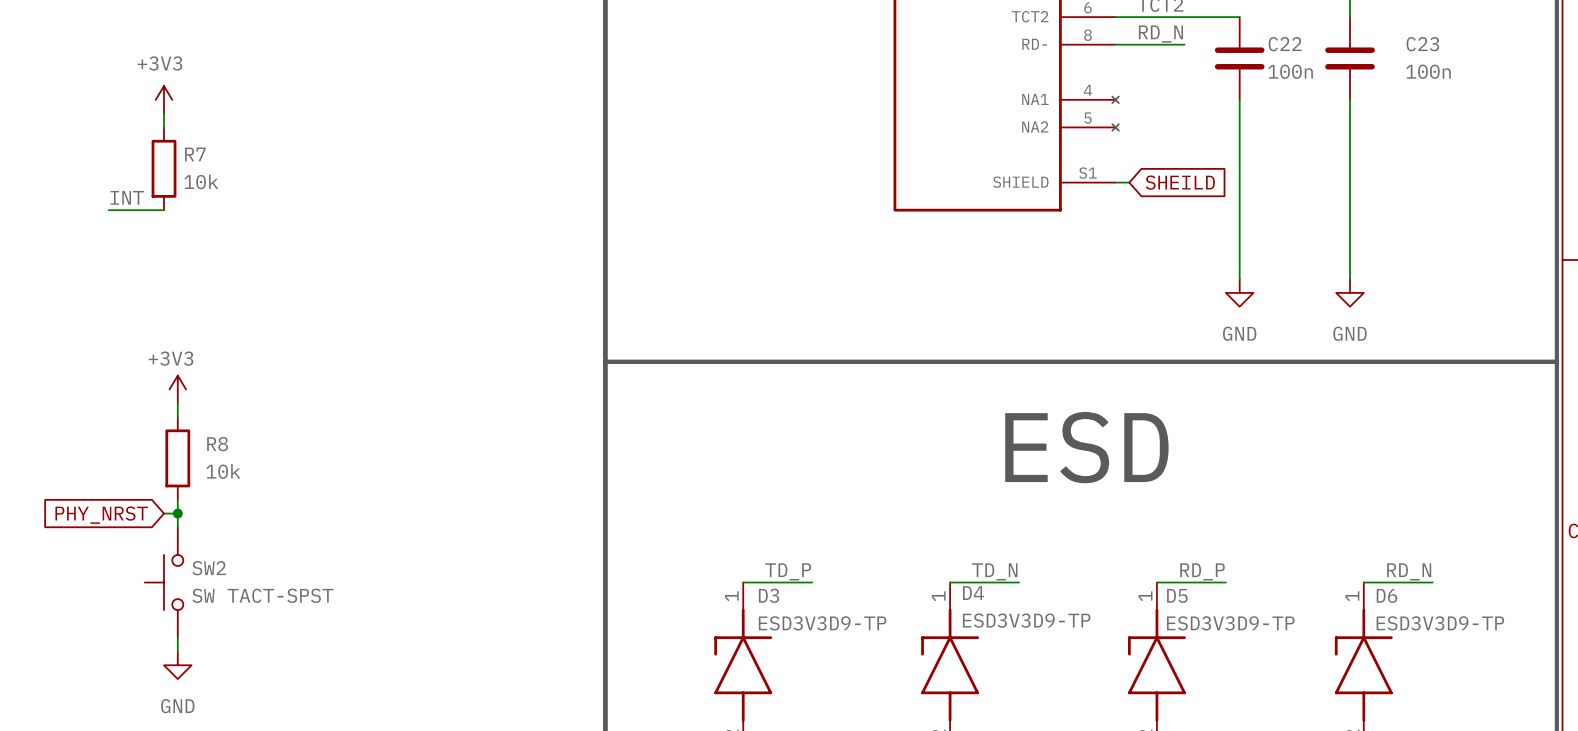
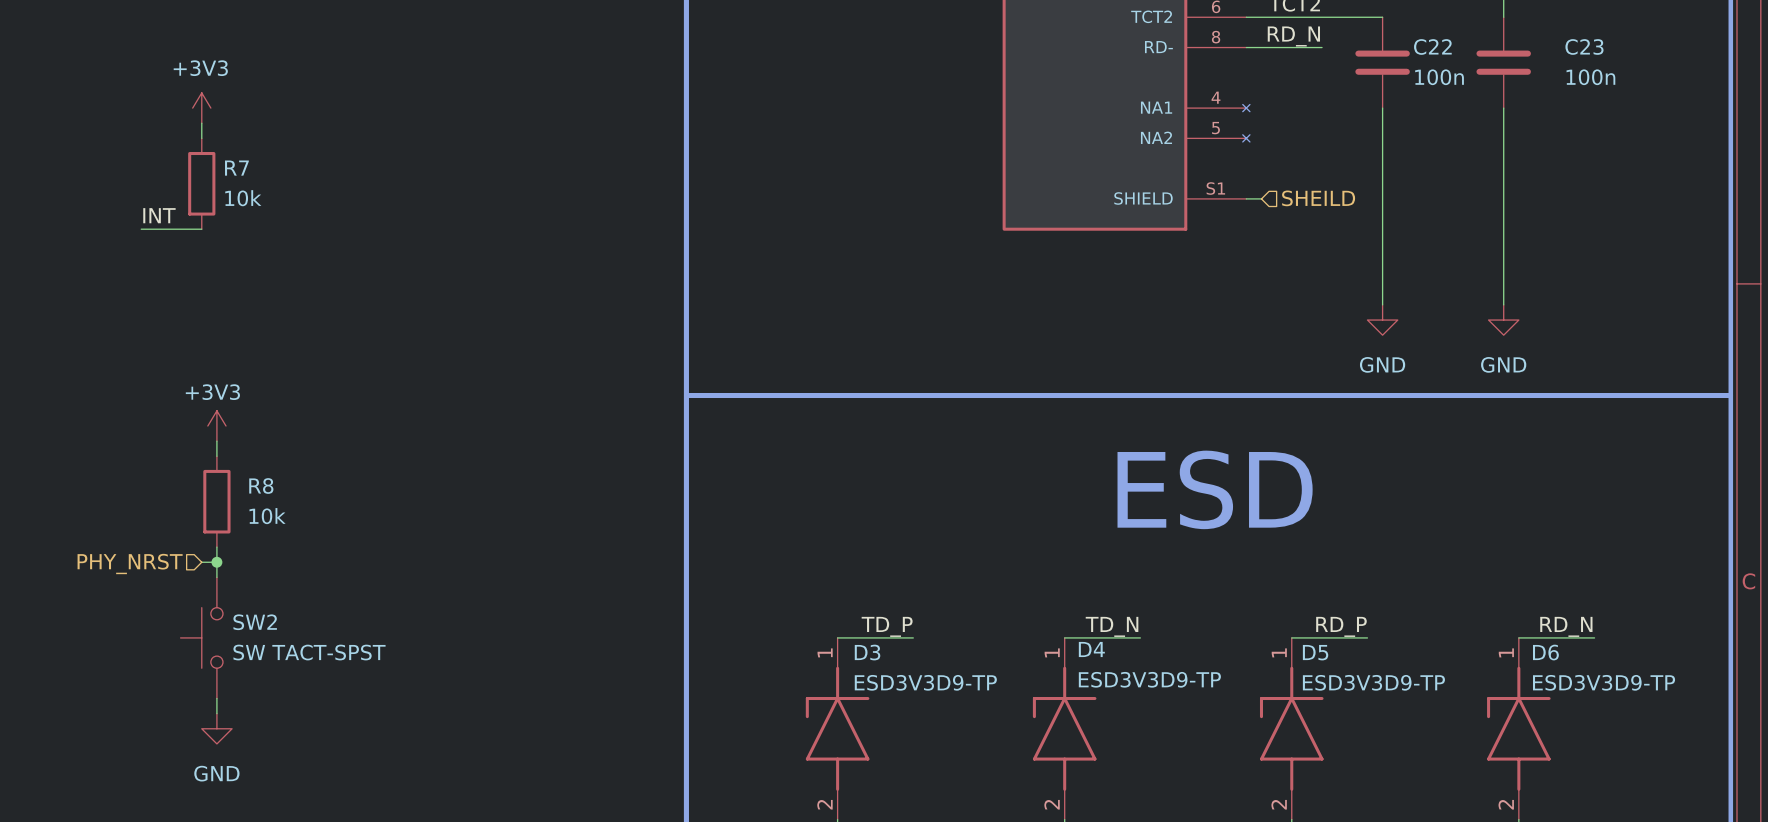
global label: SHEILD (1180, 182) -> none
hierarchical label: none -> SHEILD (1318, 198)
hierarchical label: none -> PHY_NRST (130, 564)
global label: PHY_NRST (101, 515) -> none

